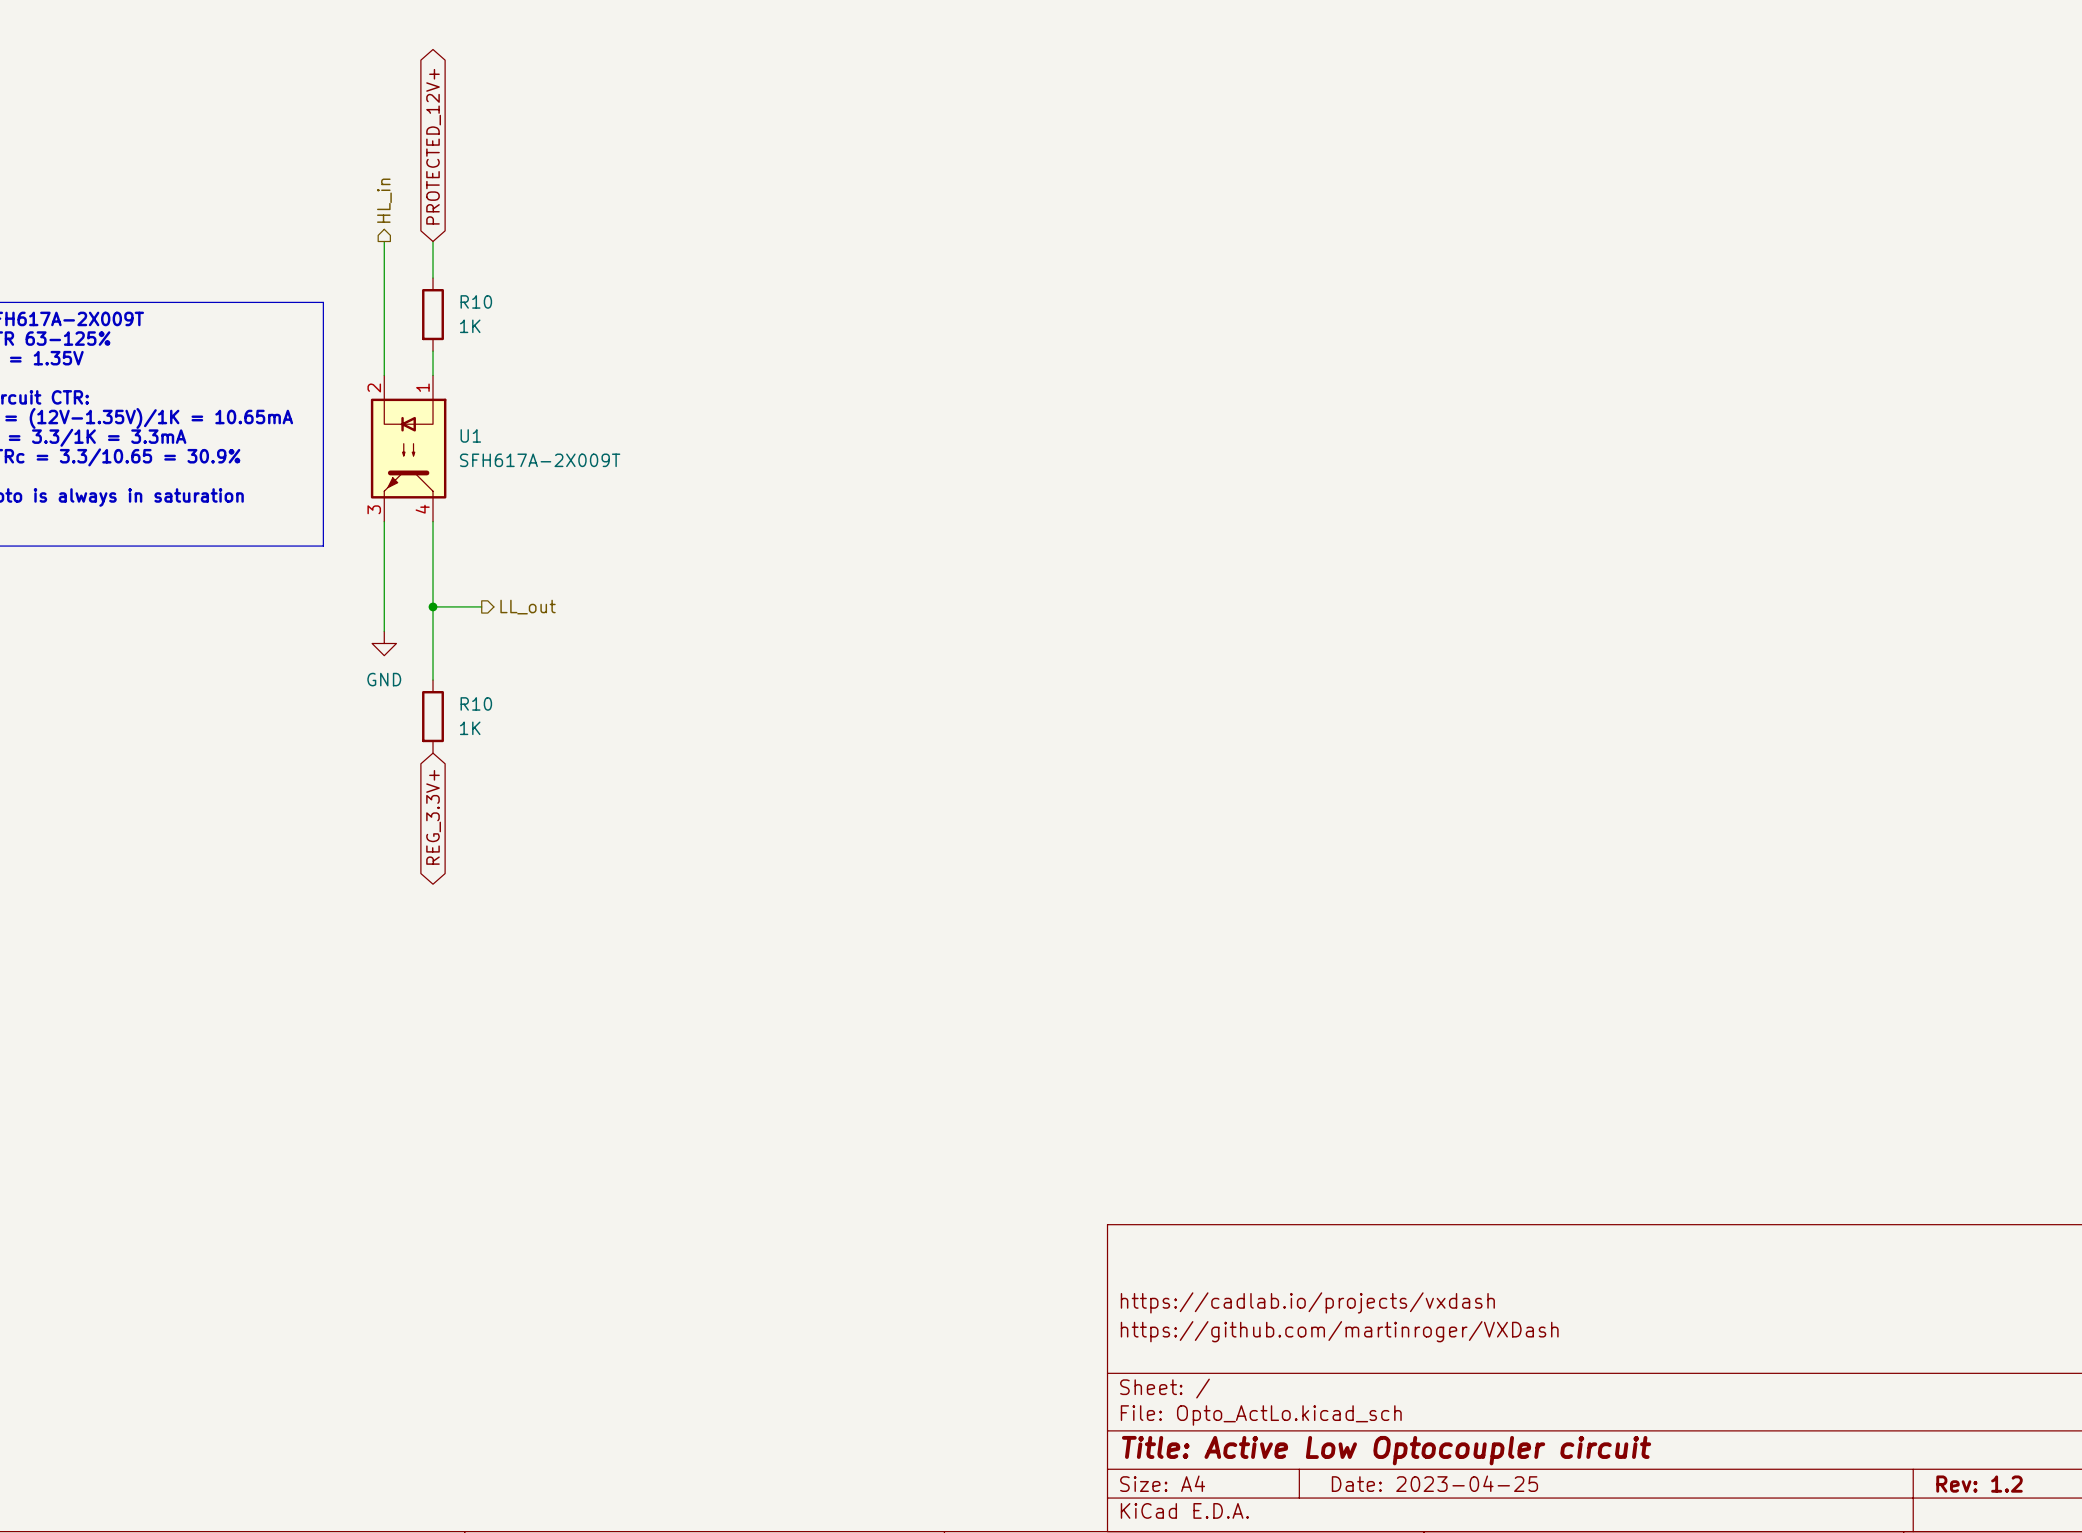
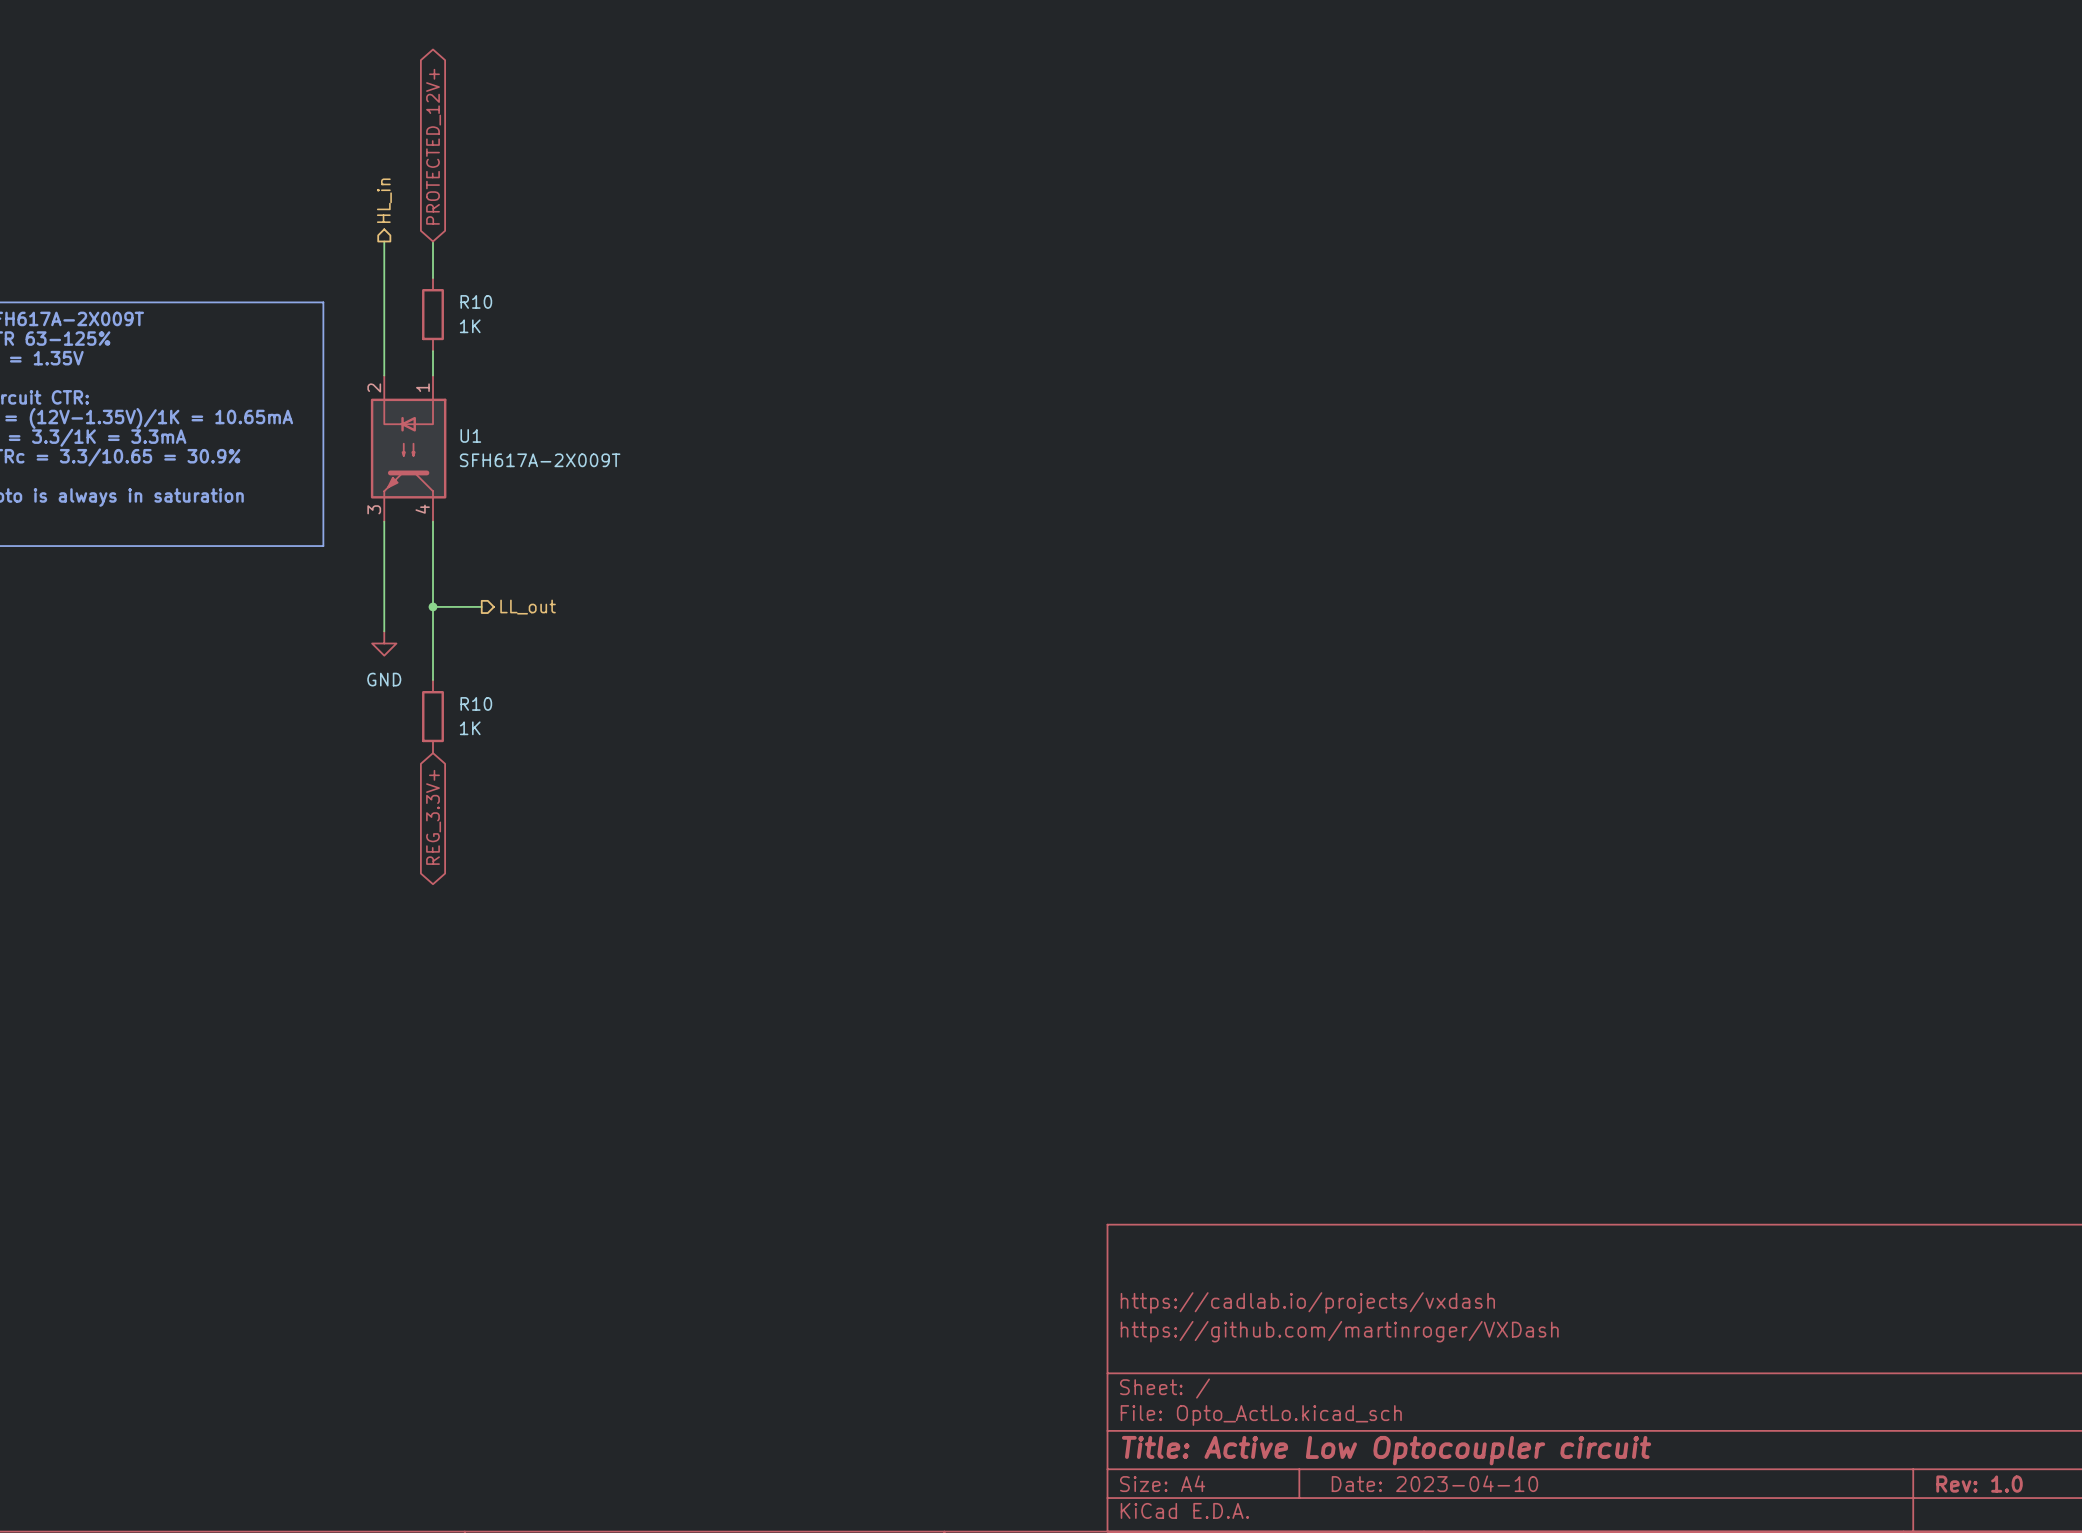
title block: Date: 2023-04-25 (1434, 1483) -> Date: 2023-04-10 (1434, 1483)
title block: Rev: 1.2 (1979, 1484) -> Rev: 1.0 (1979, 1484)

